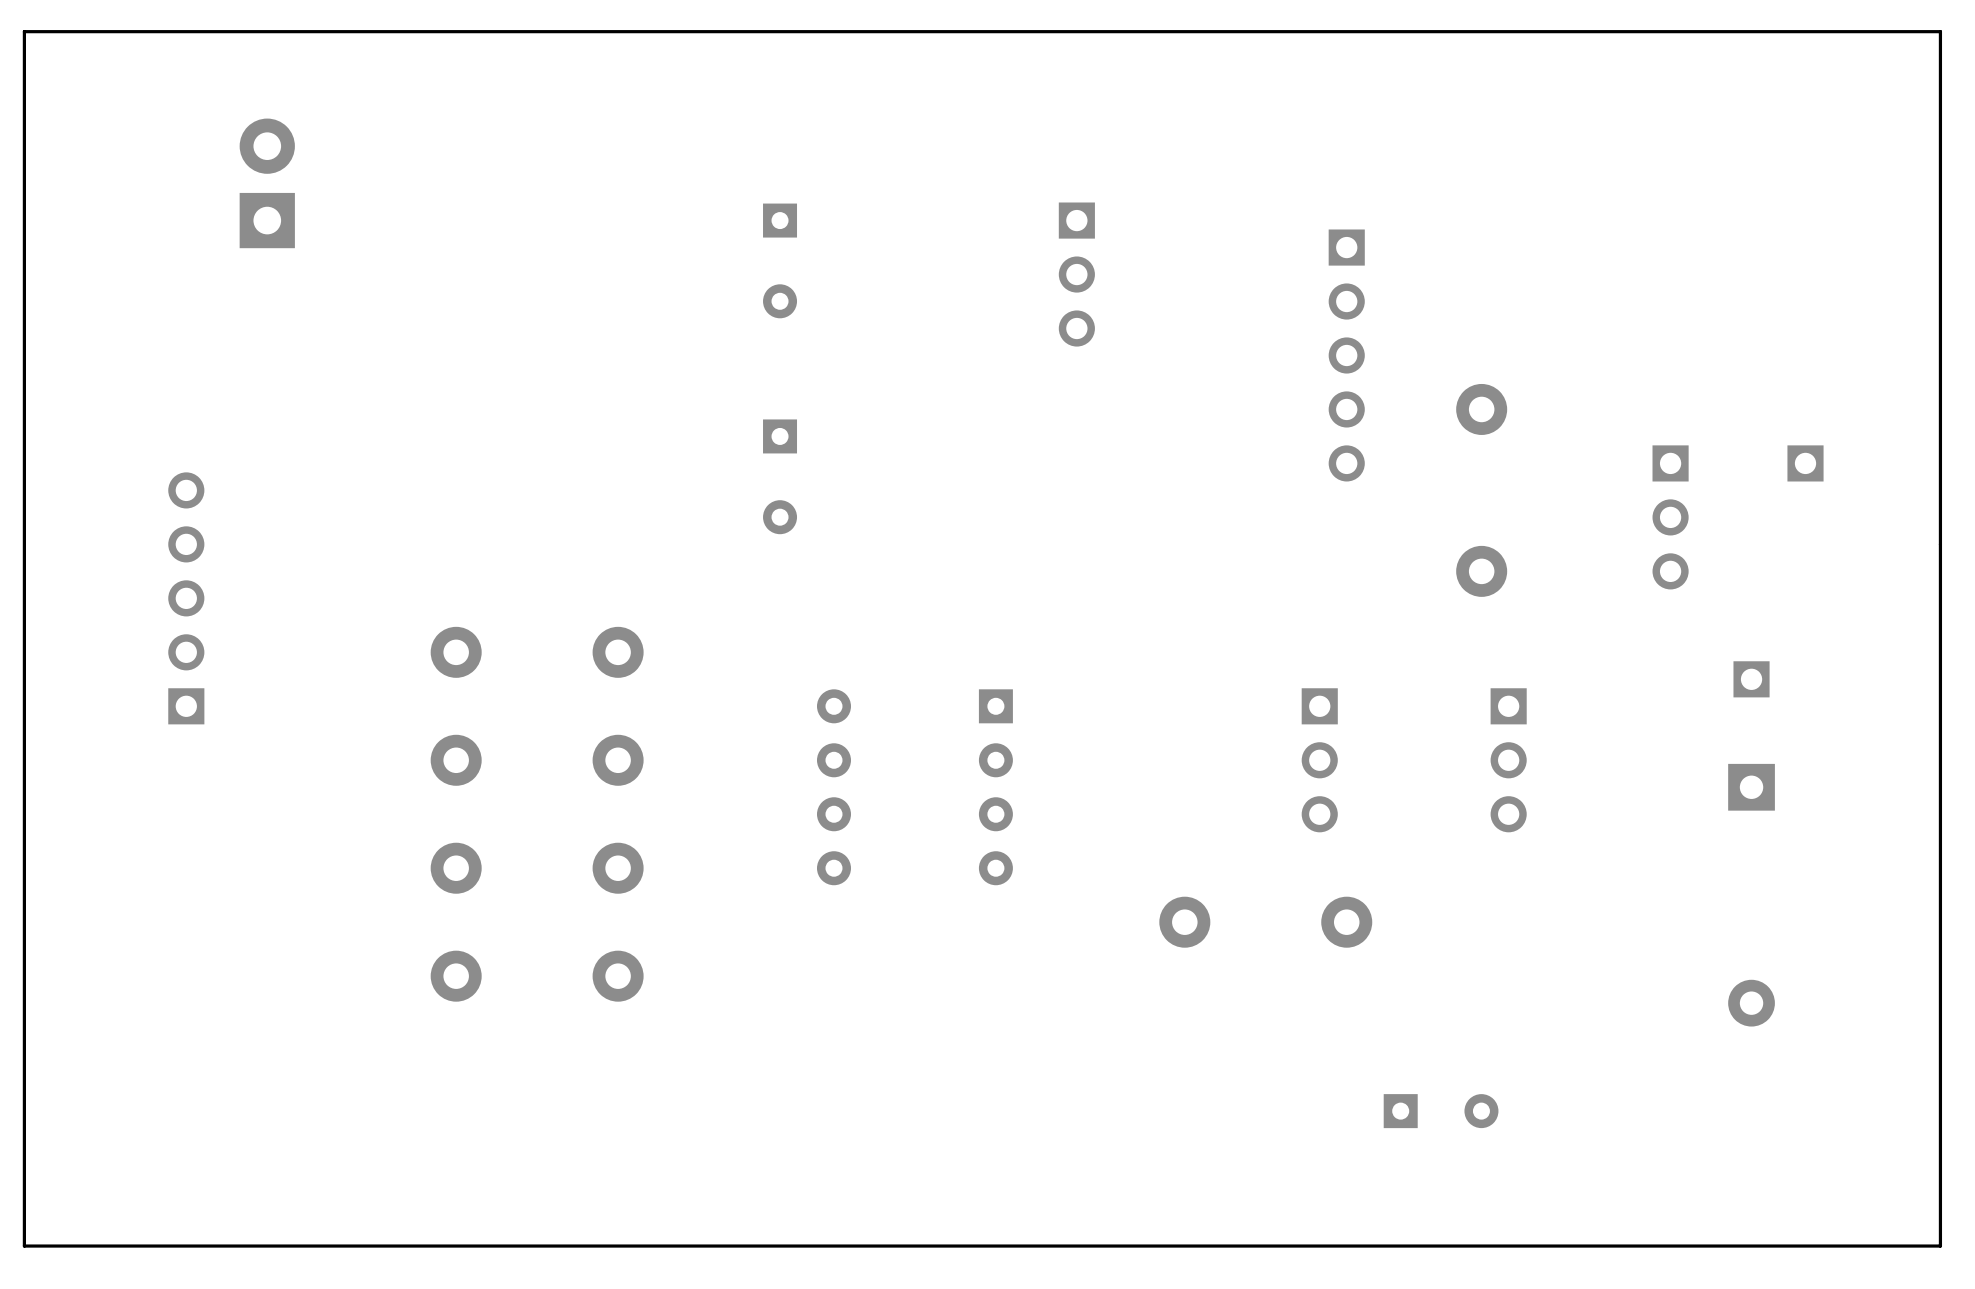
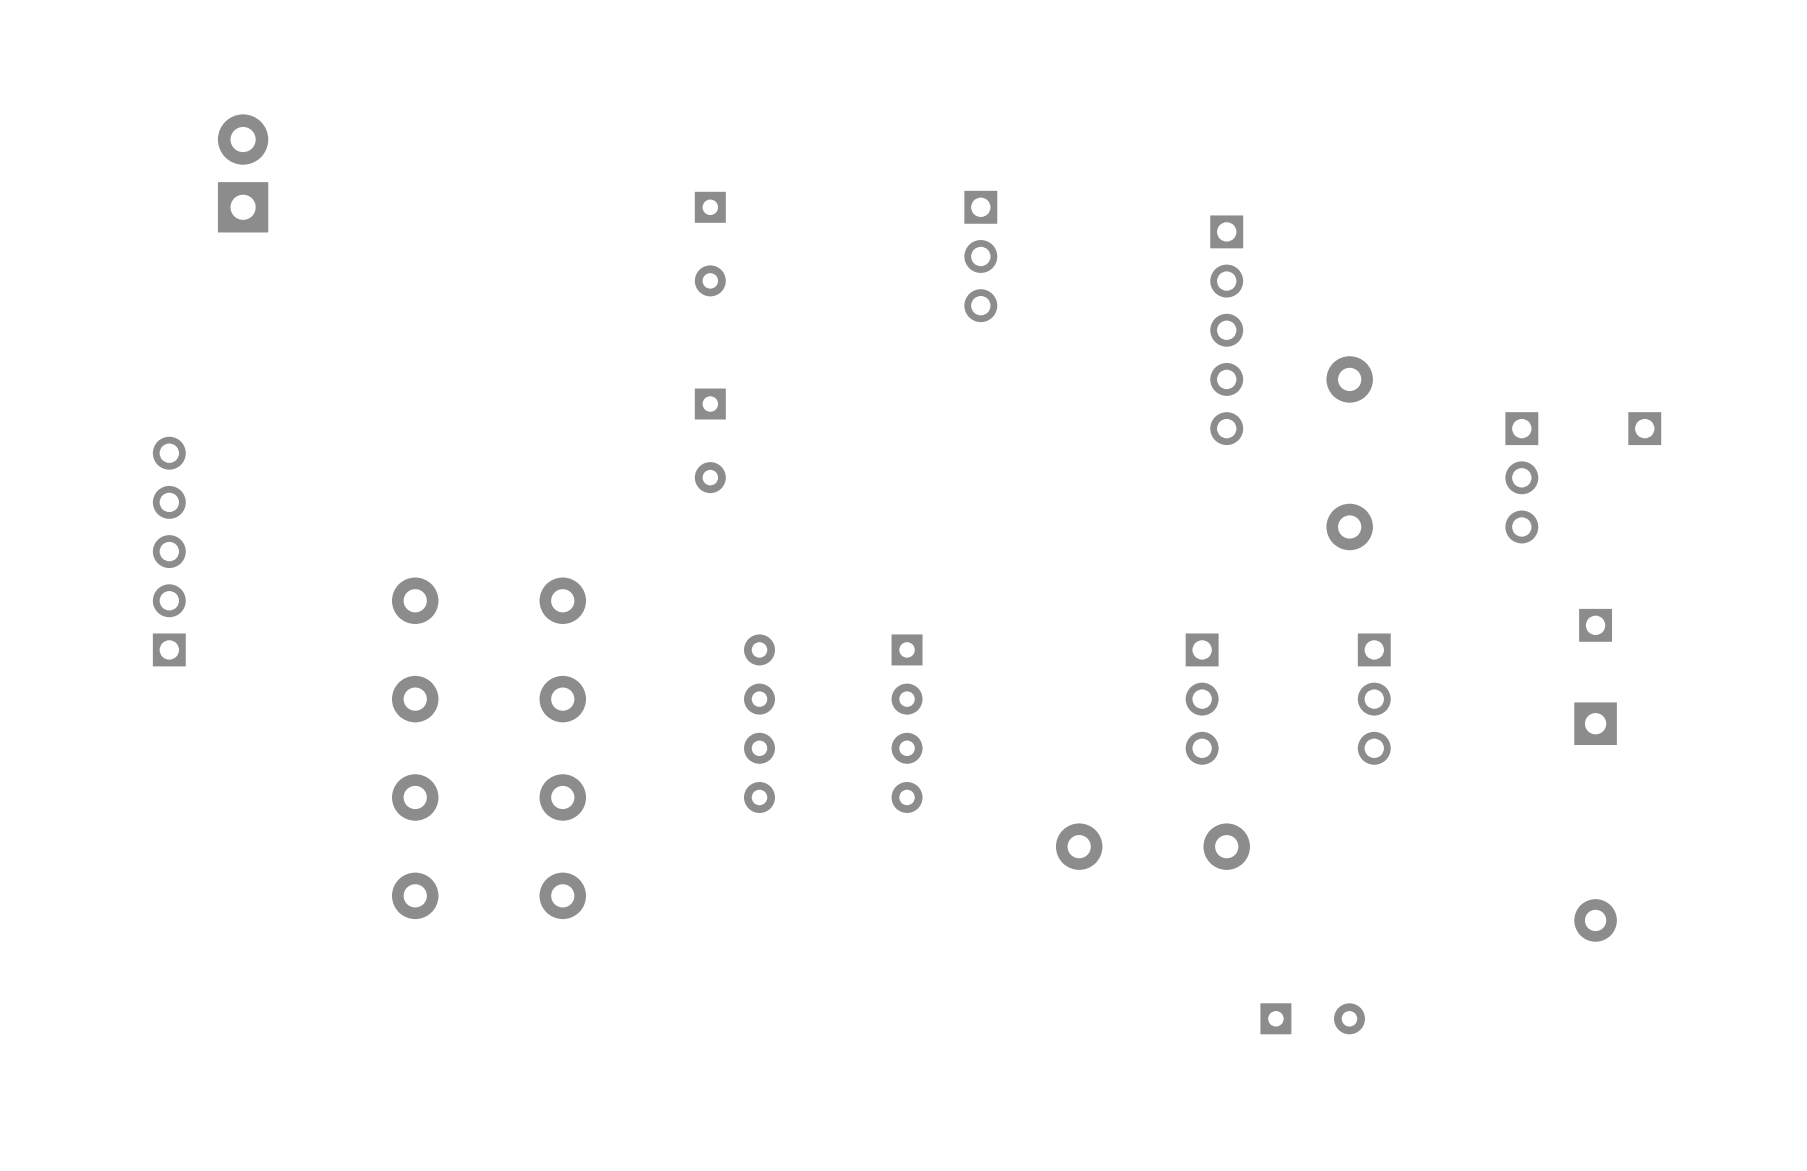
board edge: (1940, 31) (1940, 1246) (24, 1246) (24, 31) (1940, 31) -> none

